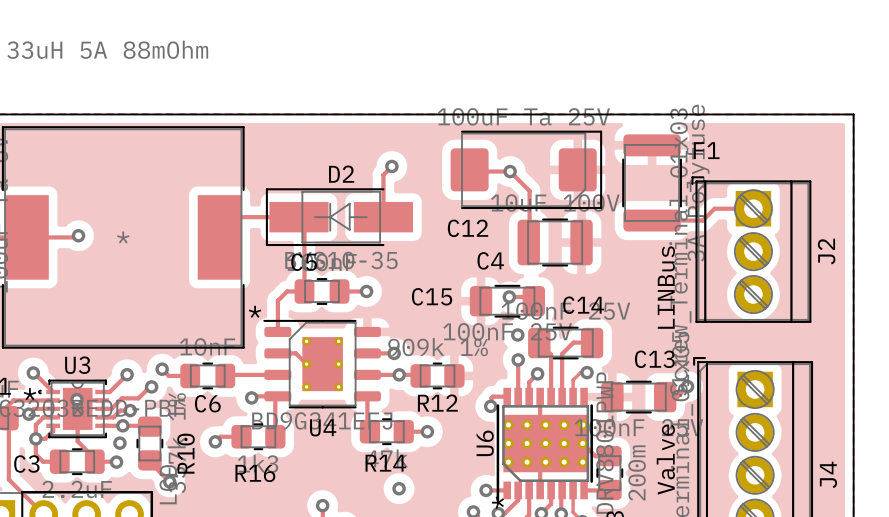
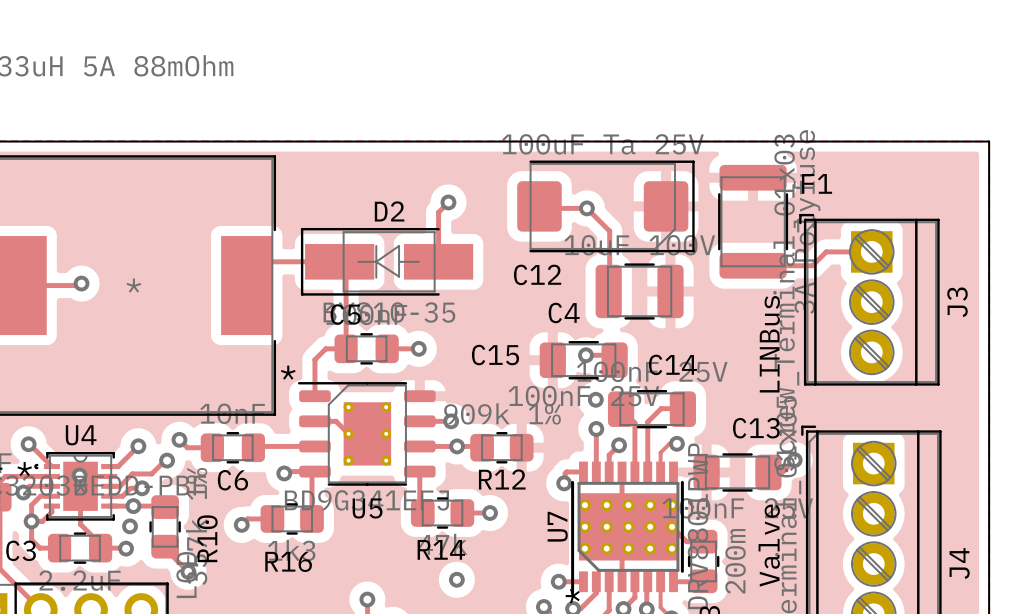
J2 name: J2 (826, 251) -> J3 (957, 302)
U3 name: U3 (77, 365) -> U4 (81, 435)
U4 name: U4 (323, 427) -> U5 (367, 508)
U6 name: U6 (485, 443) -> U7 (557, 526)

